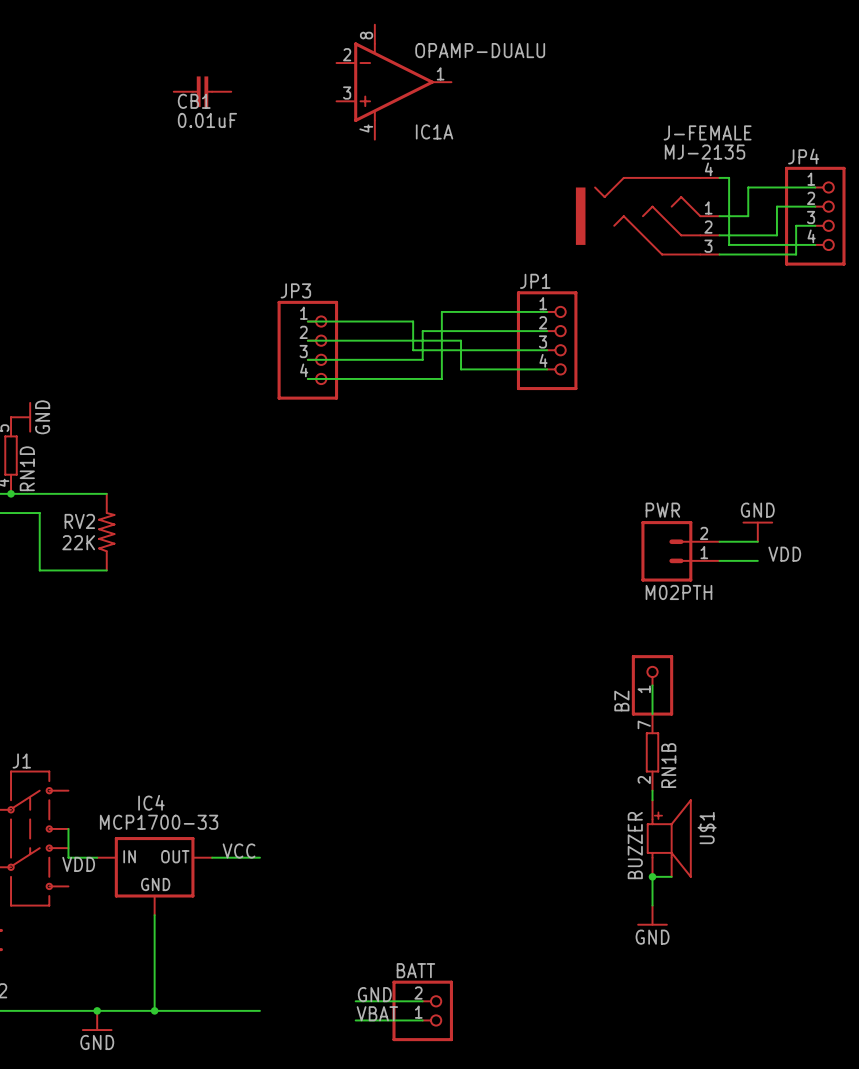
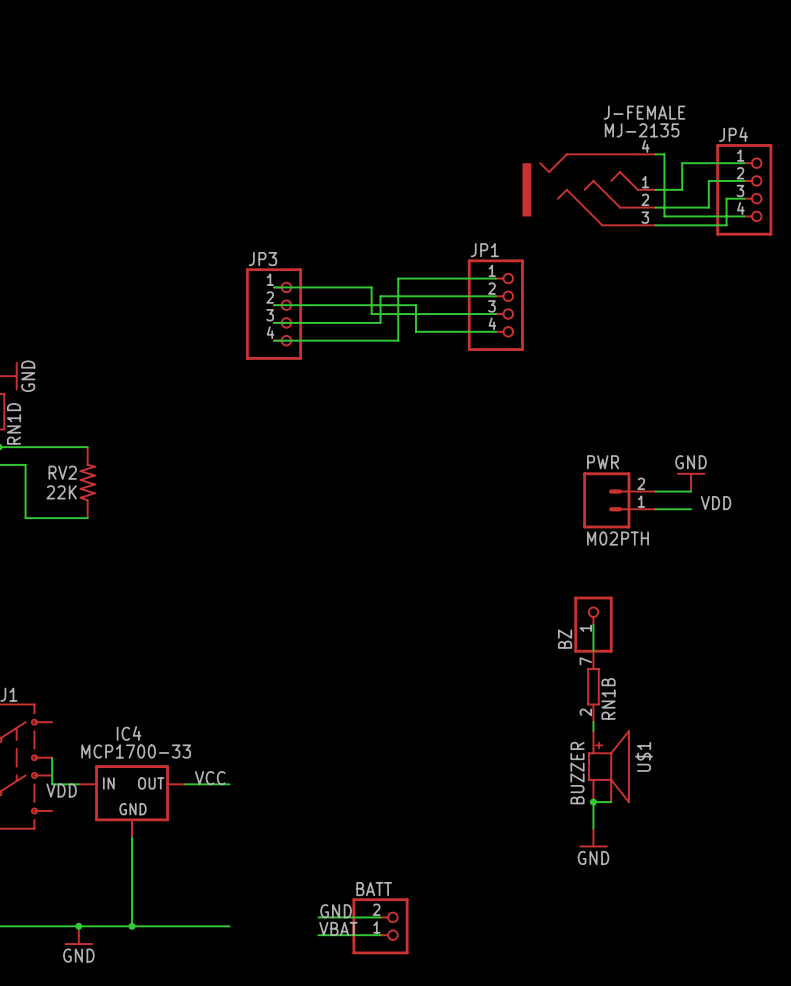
IC1A: OPAMP-DUALU (394, 82) -> none
CB1: 0.01uF (202, 91) -> none

